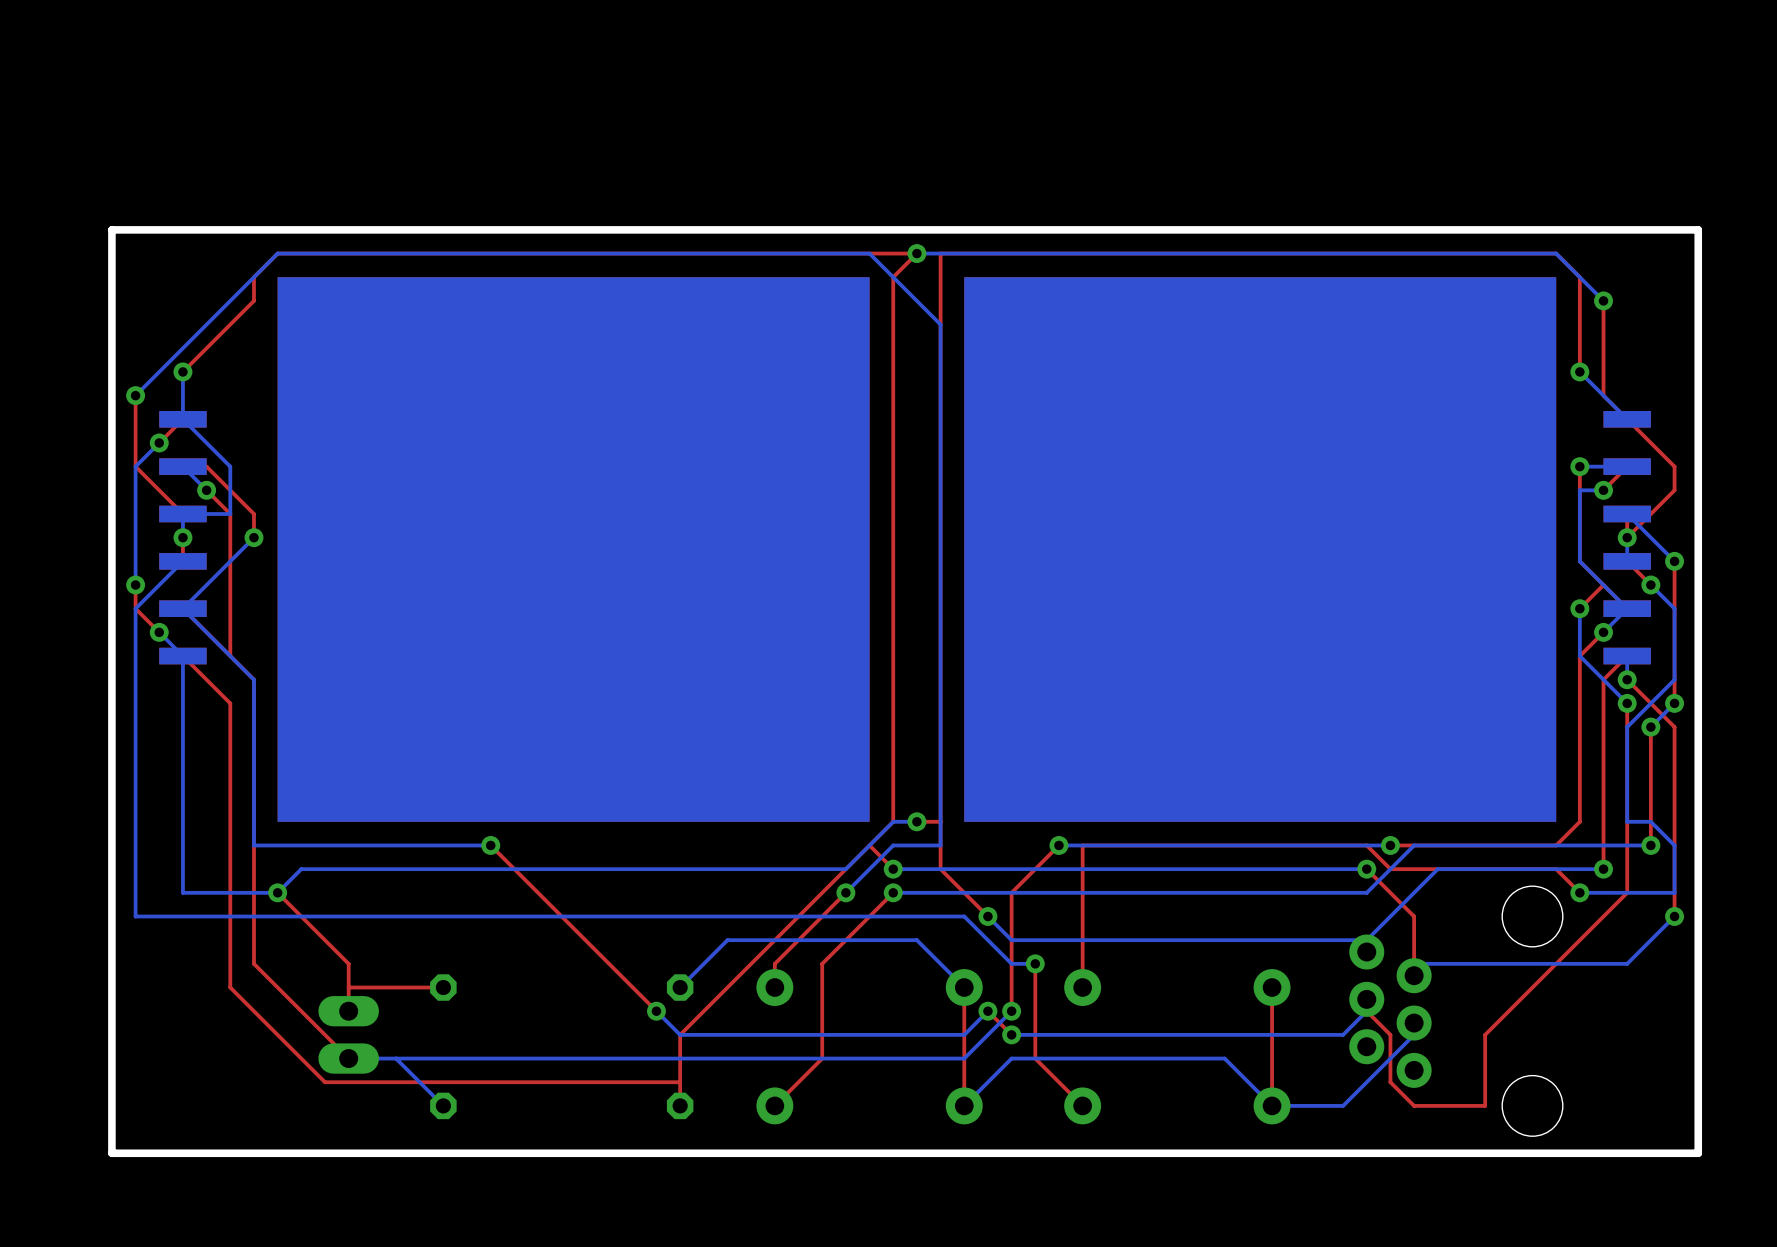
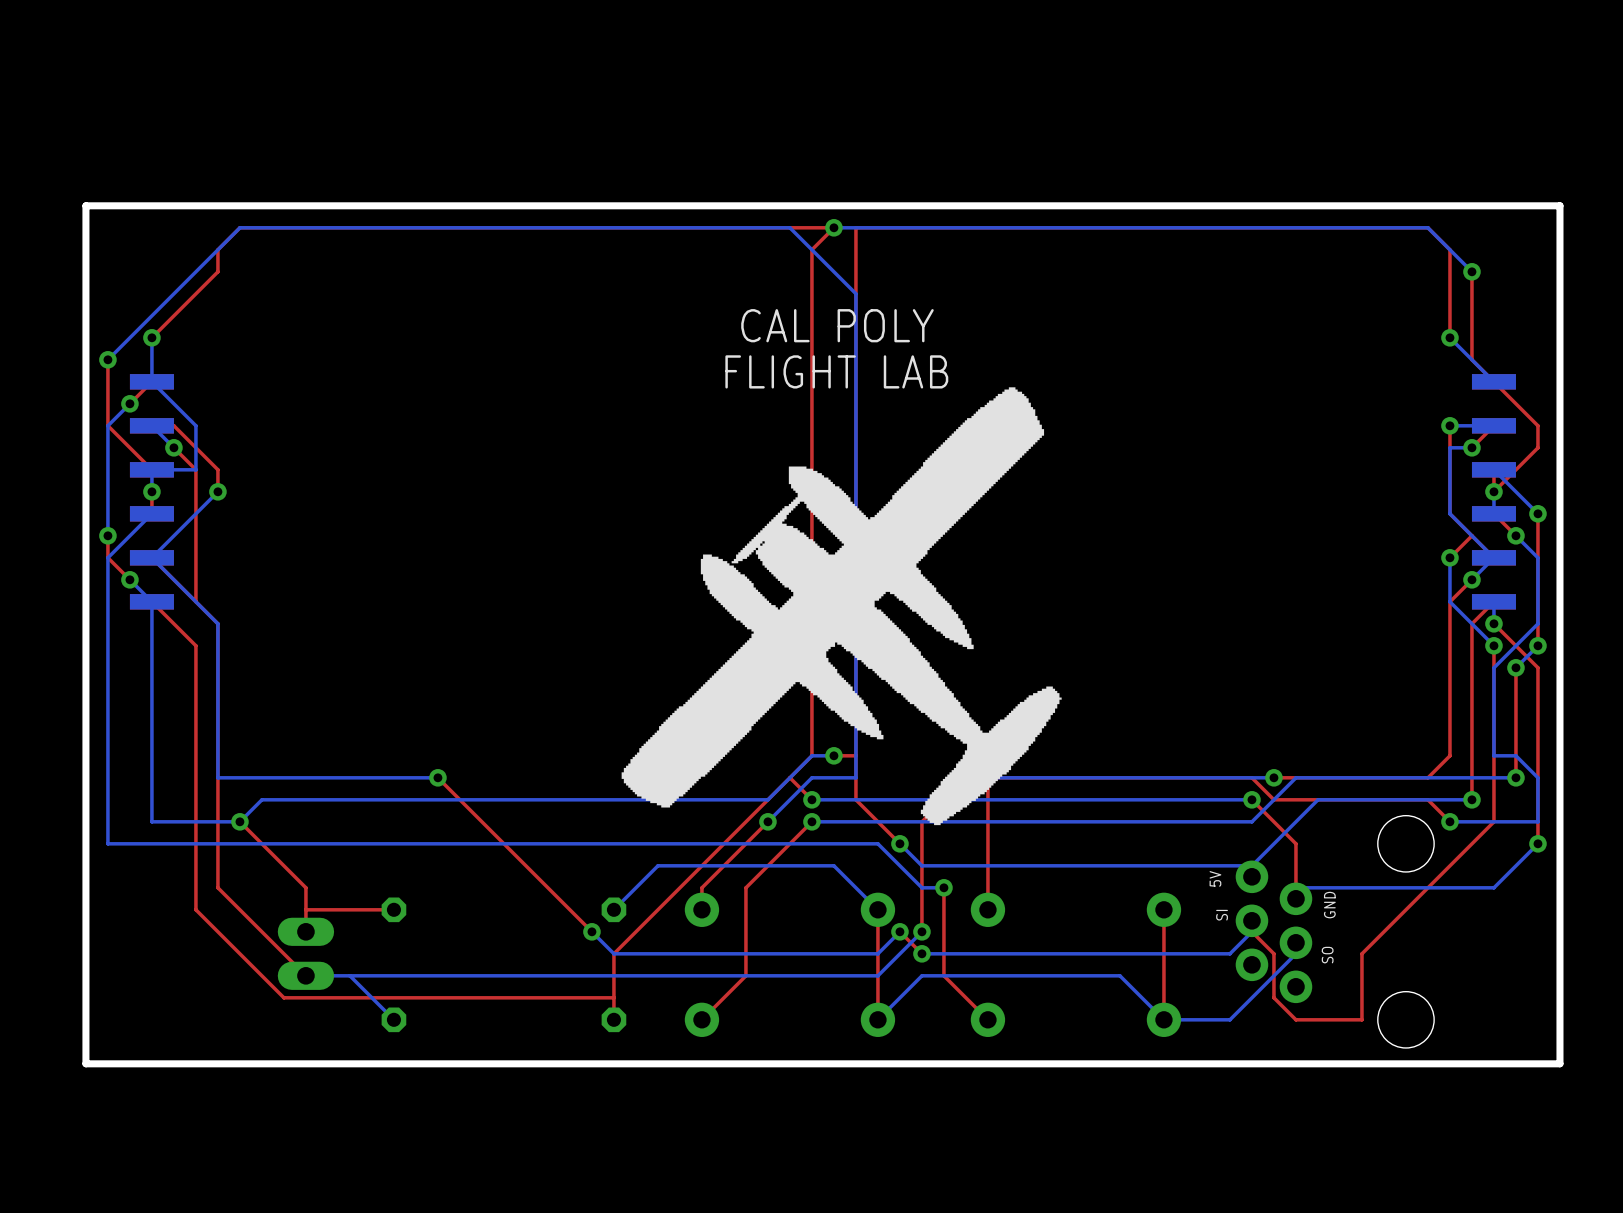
drawing: [277, 277, 870, 822] -> none
drawing: [964, 277, 1557, 822] -> none
text: none -> CAL POLY (837, 325)
text: none -> FLIGHT LAB (836, 371)
drawing: none -> [621, 387, 1062, 826]
text: none -> 5V (1215, 878)
text: none -> GND (1329, 905)
text: none -> SI (1222, 915)
text: none -> SO (1327, 955)

